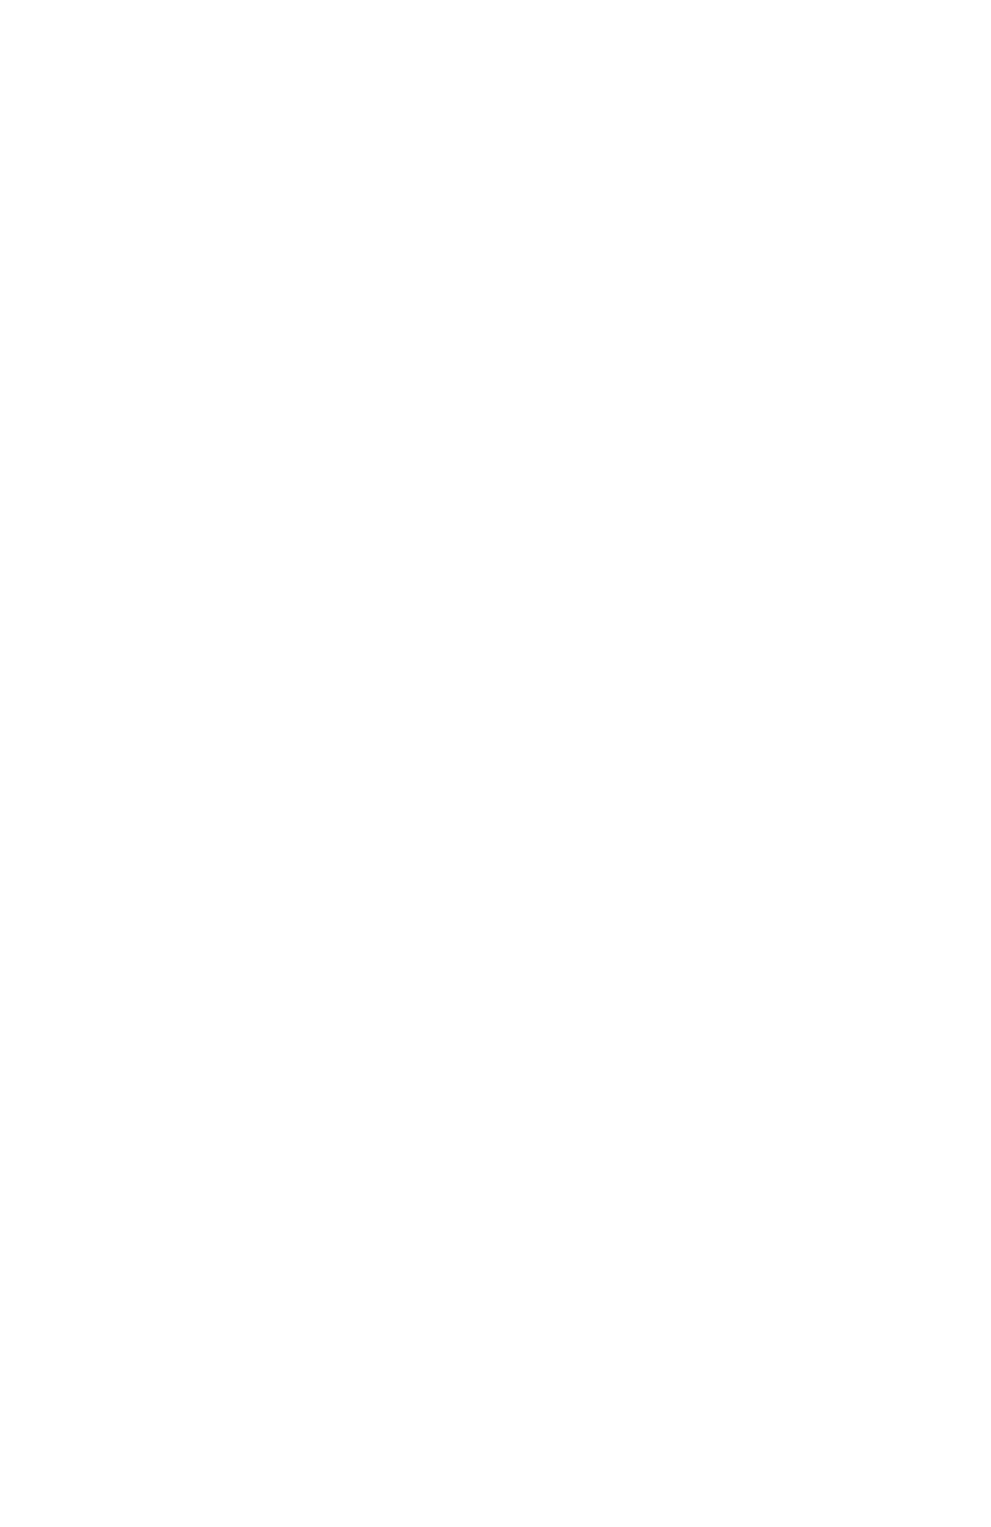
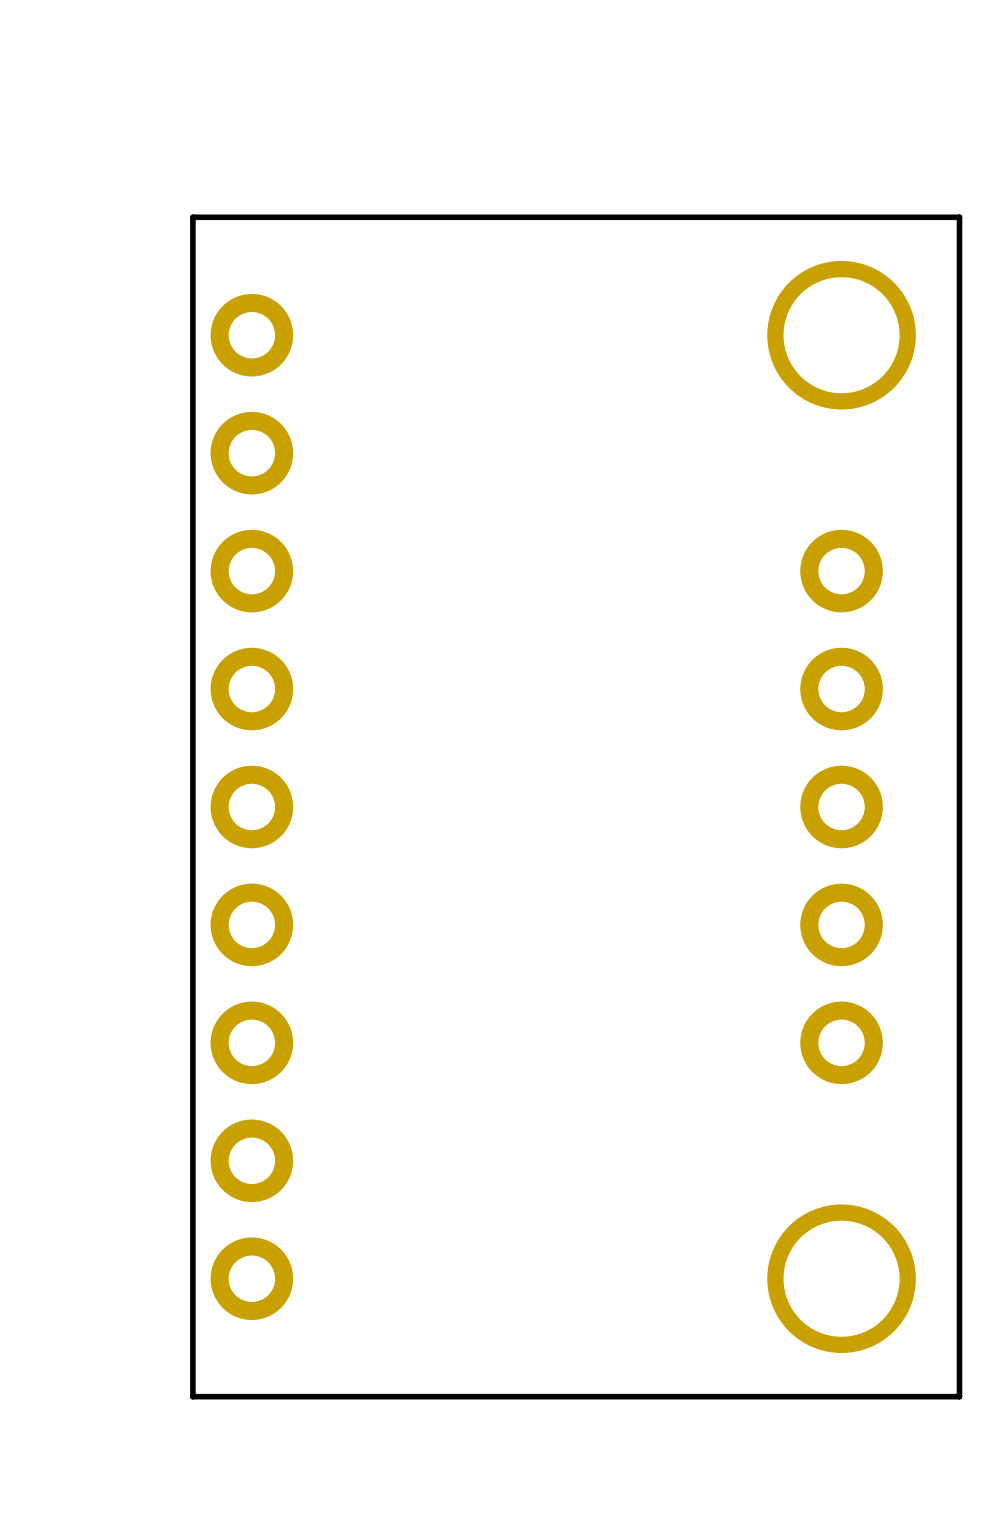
part: none -> (576, 806)

